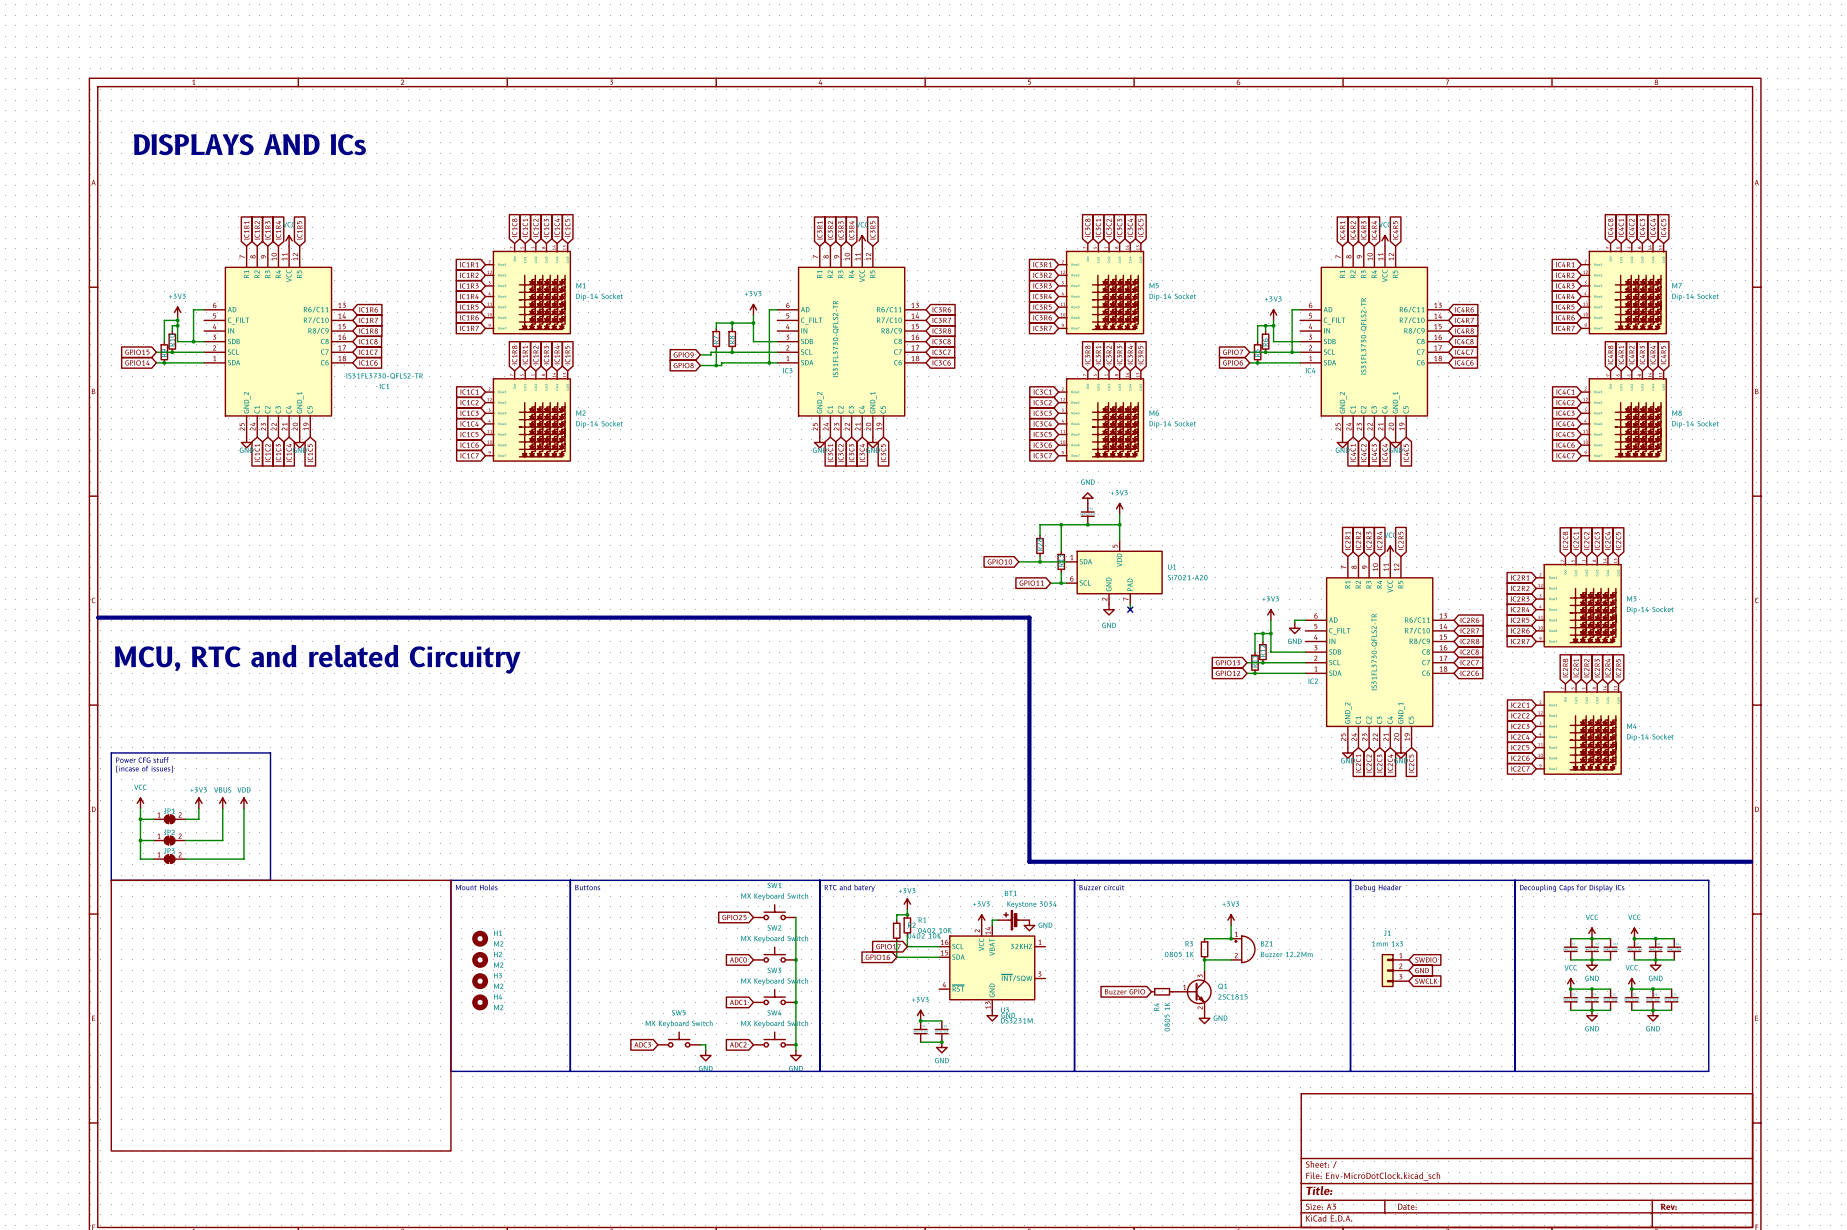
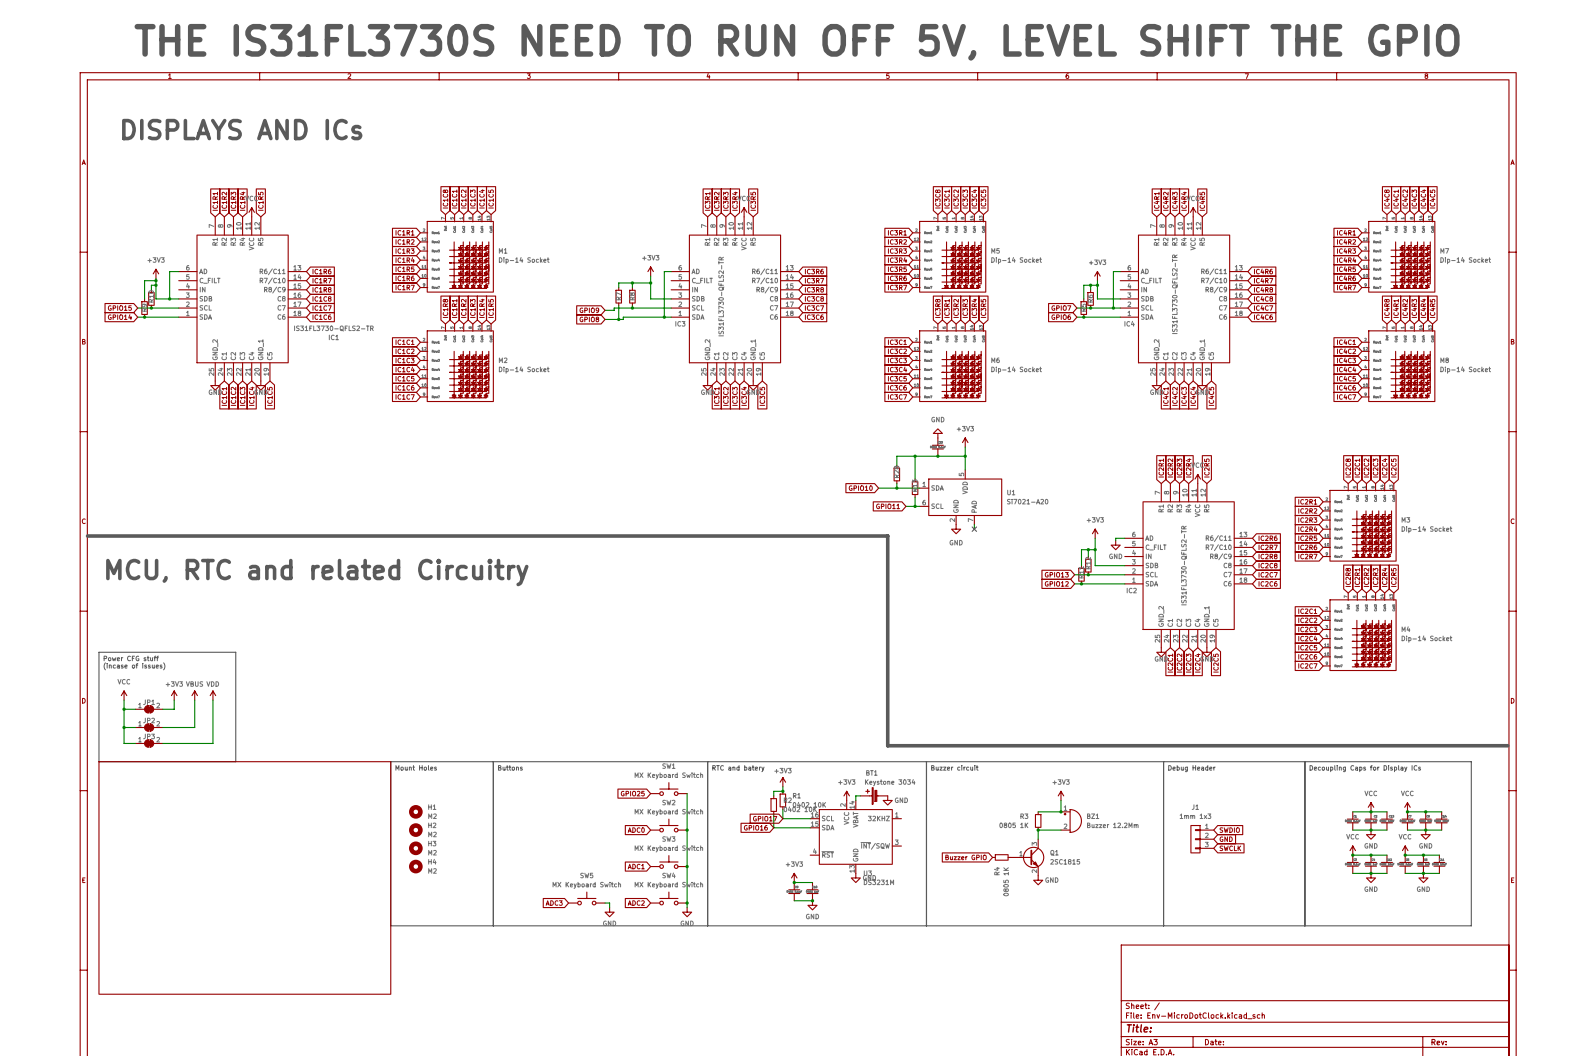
text: none -> THE IS31FL3730S NEED TO RUN OFF 5V, LEVEL SHIFT THE GPIO (797, 42)

